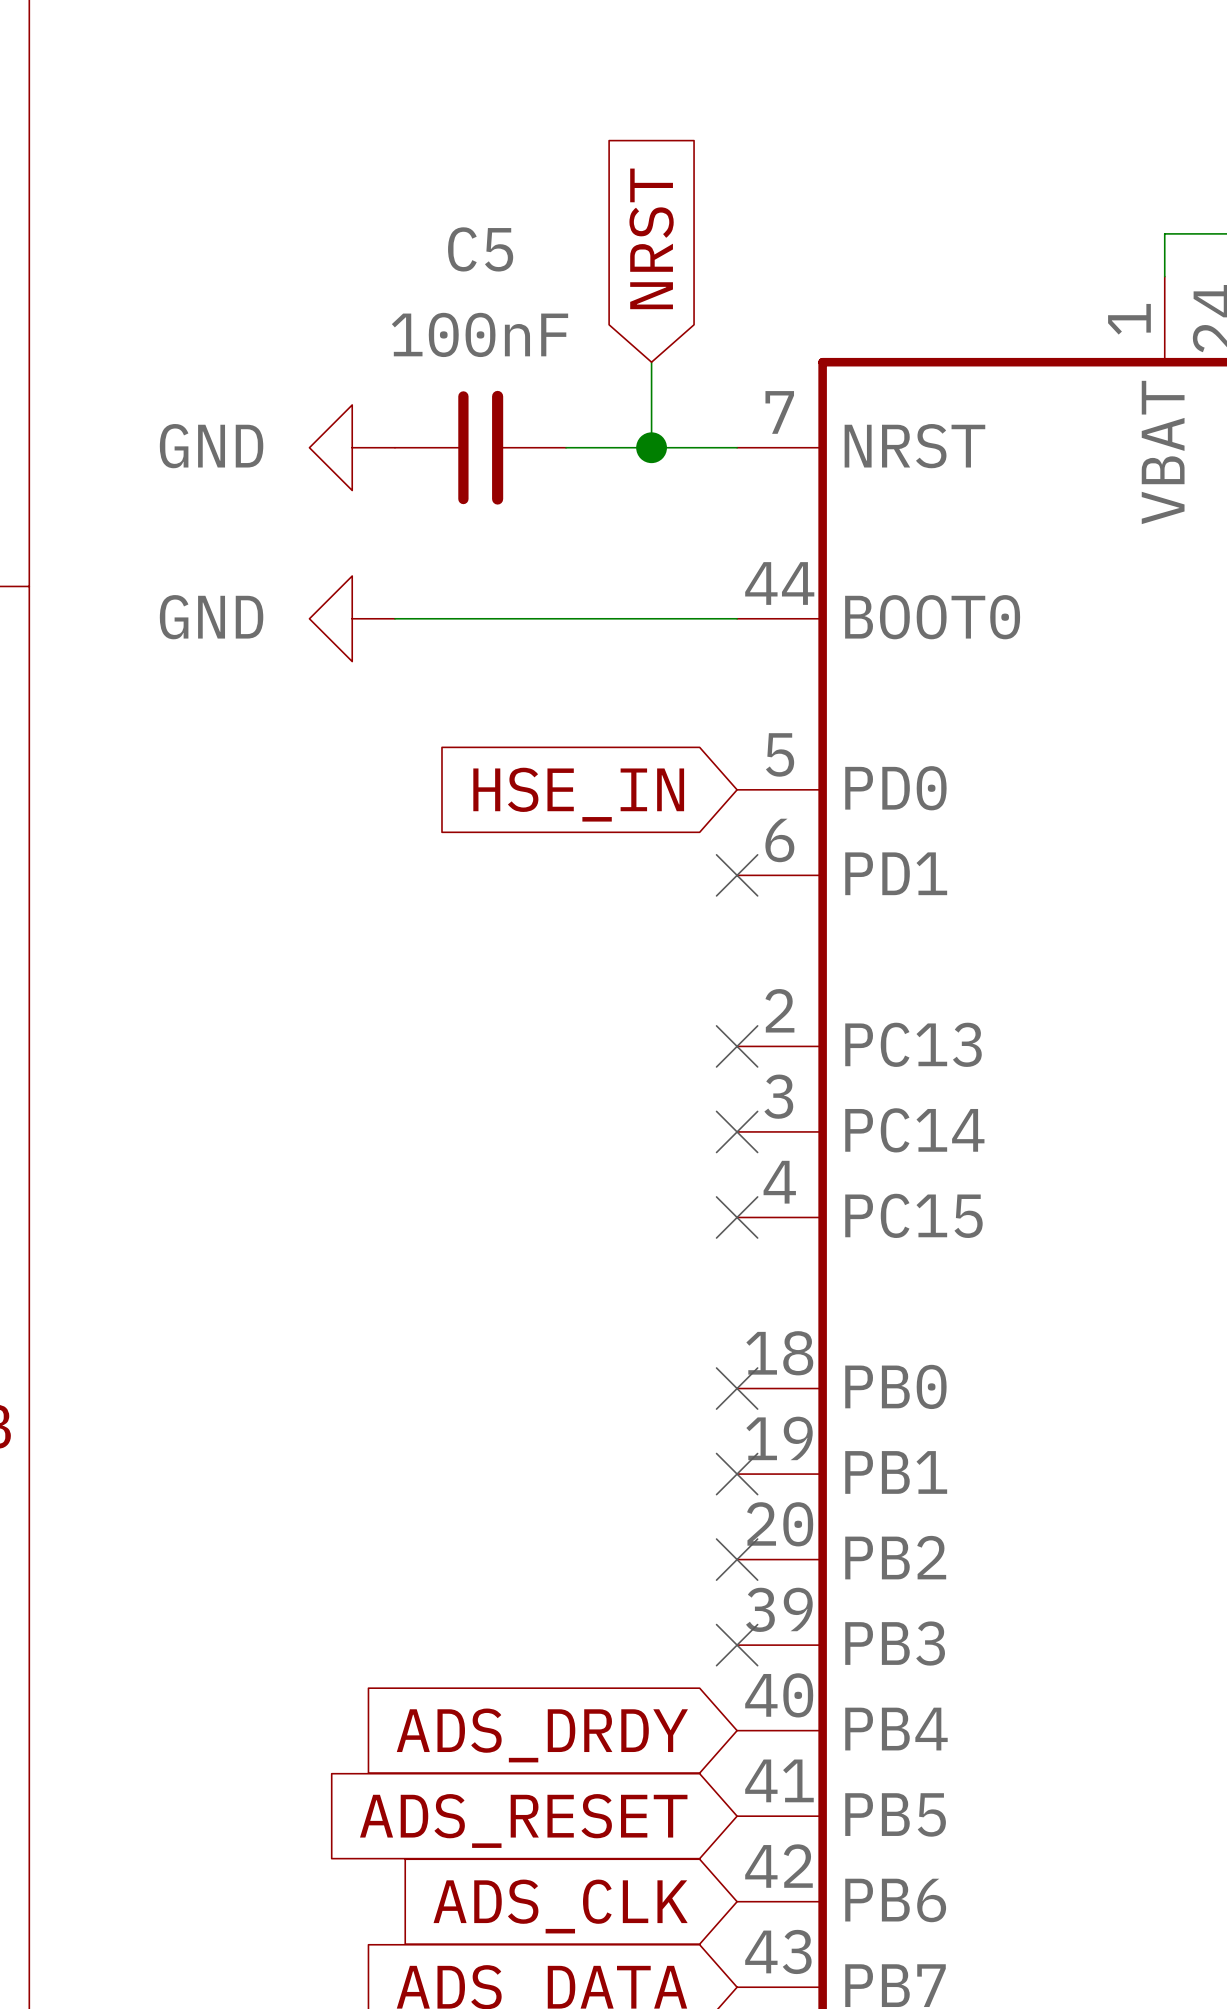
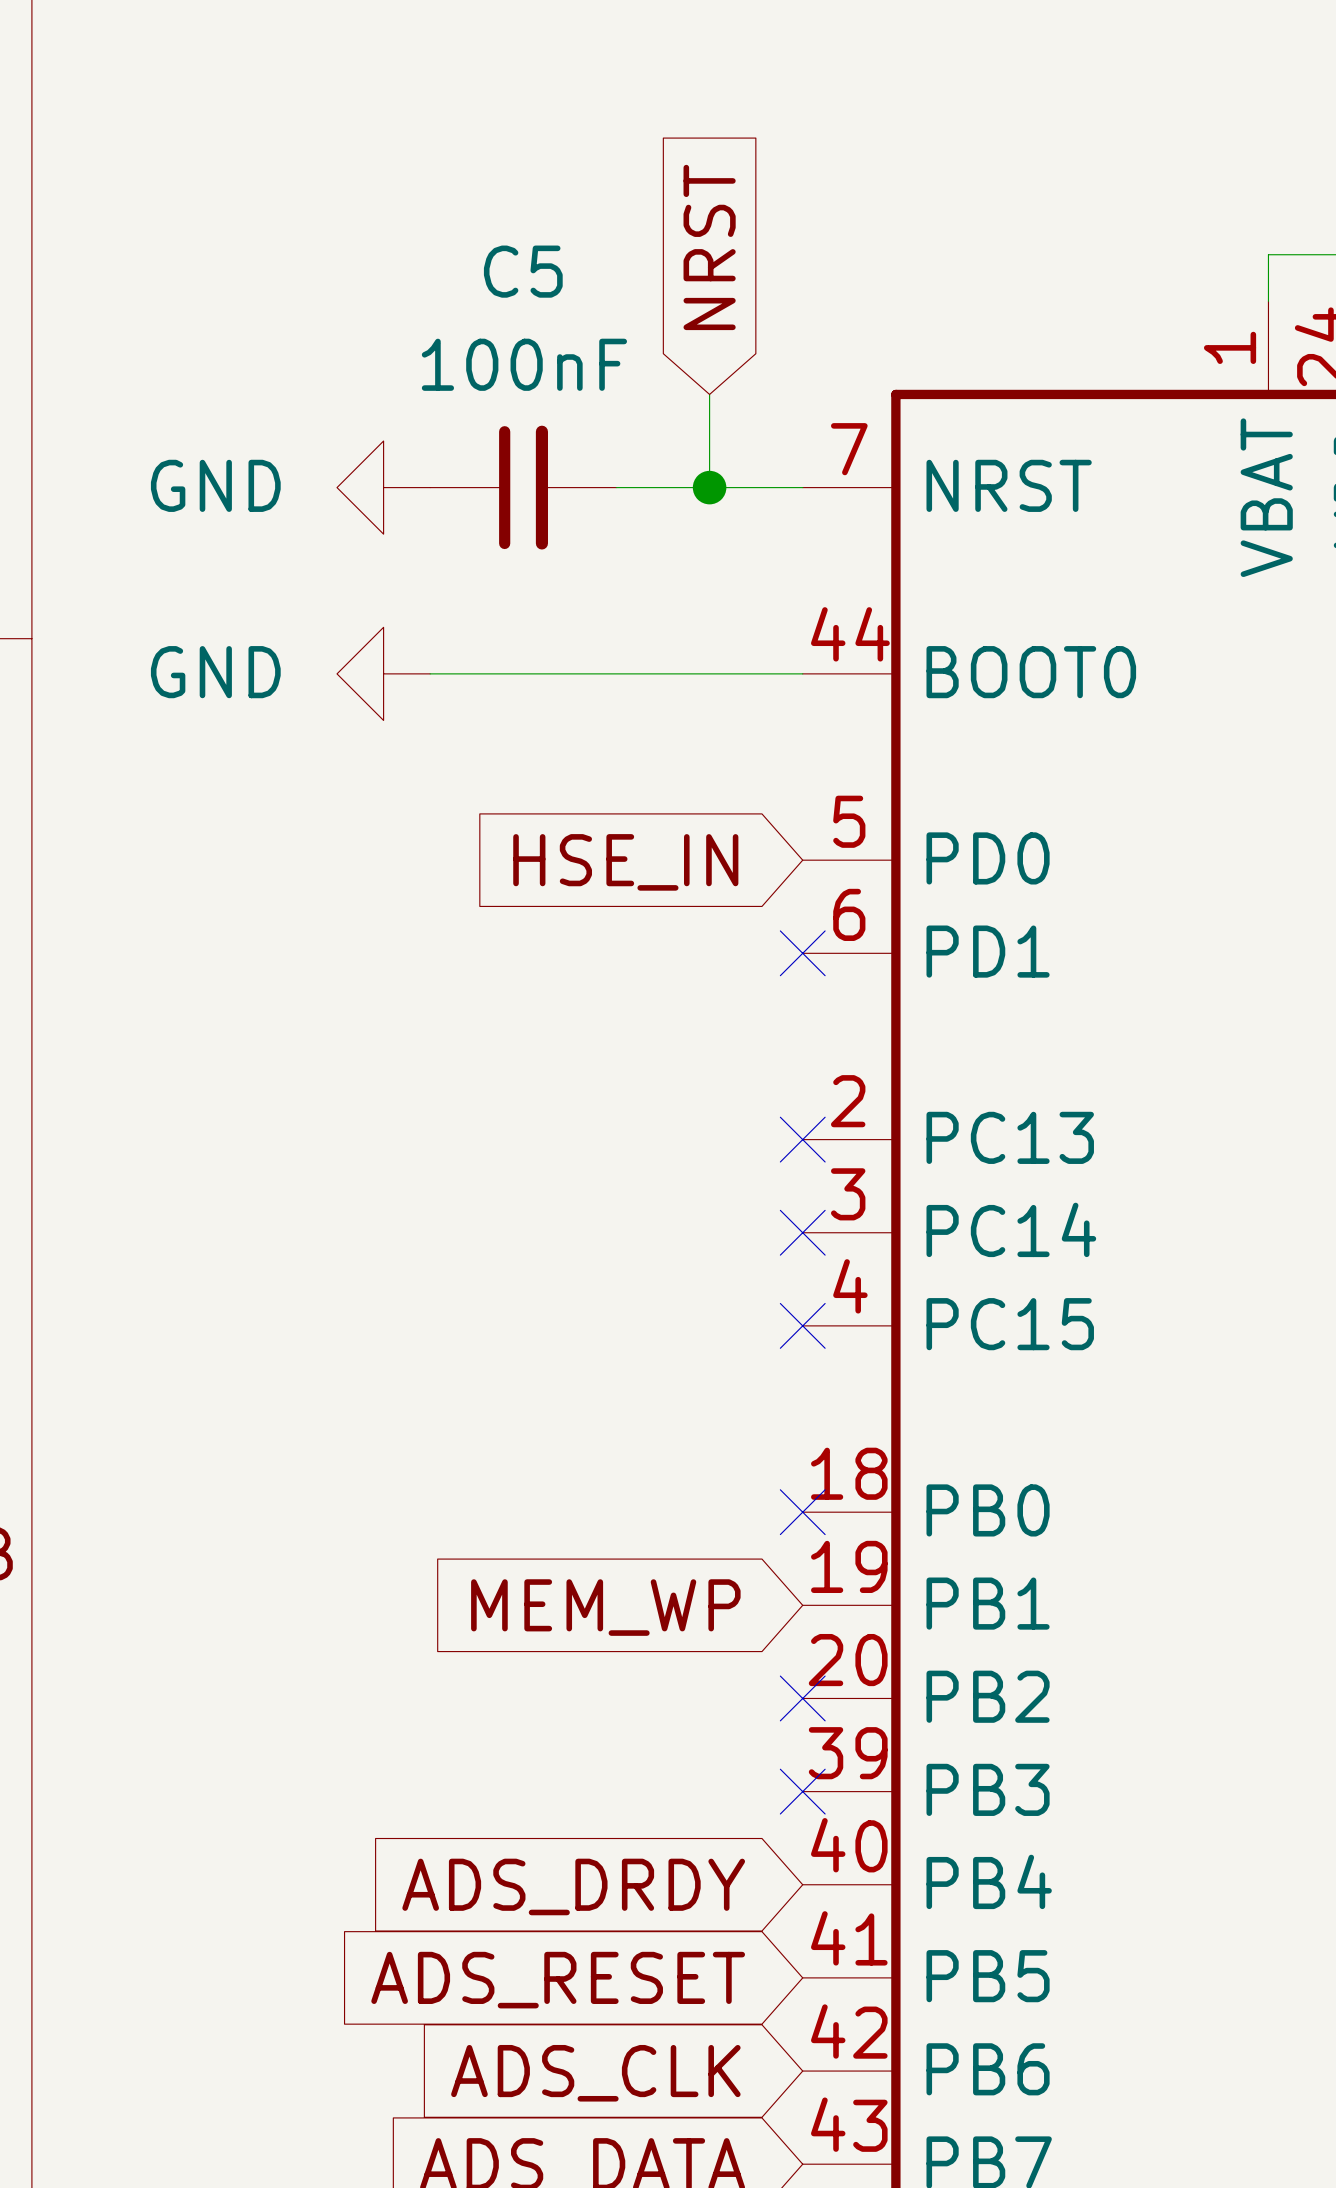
no-connect mark: (737, 1474) -> none
global label: none -> MEM_WP (605, 1607)

